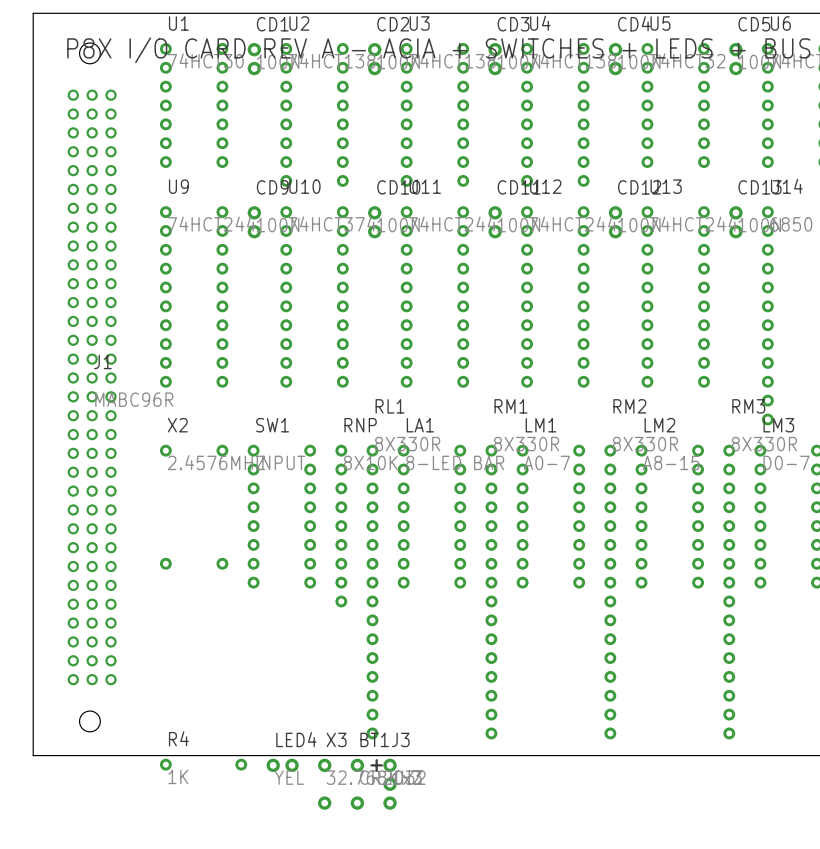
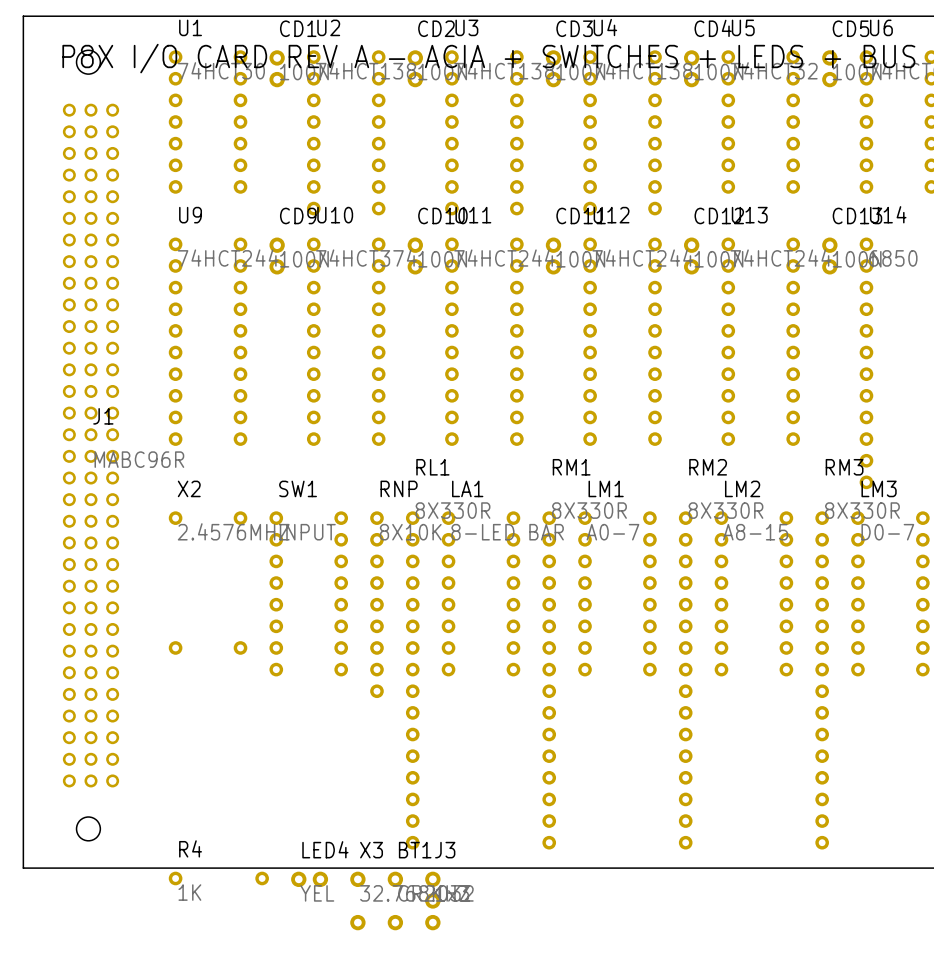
BT1 footprint: [350, 758, 384, 810] -> [387, 871, 404, 931]

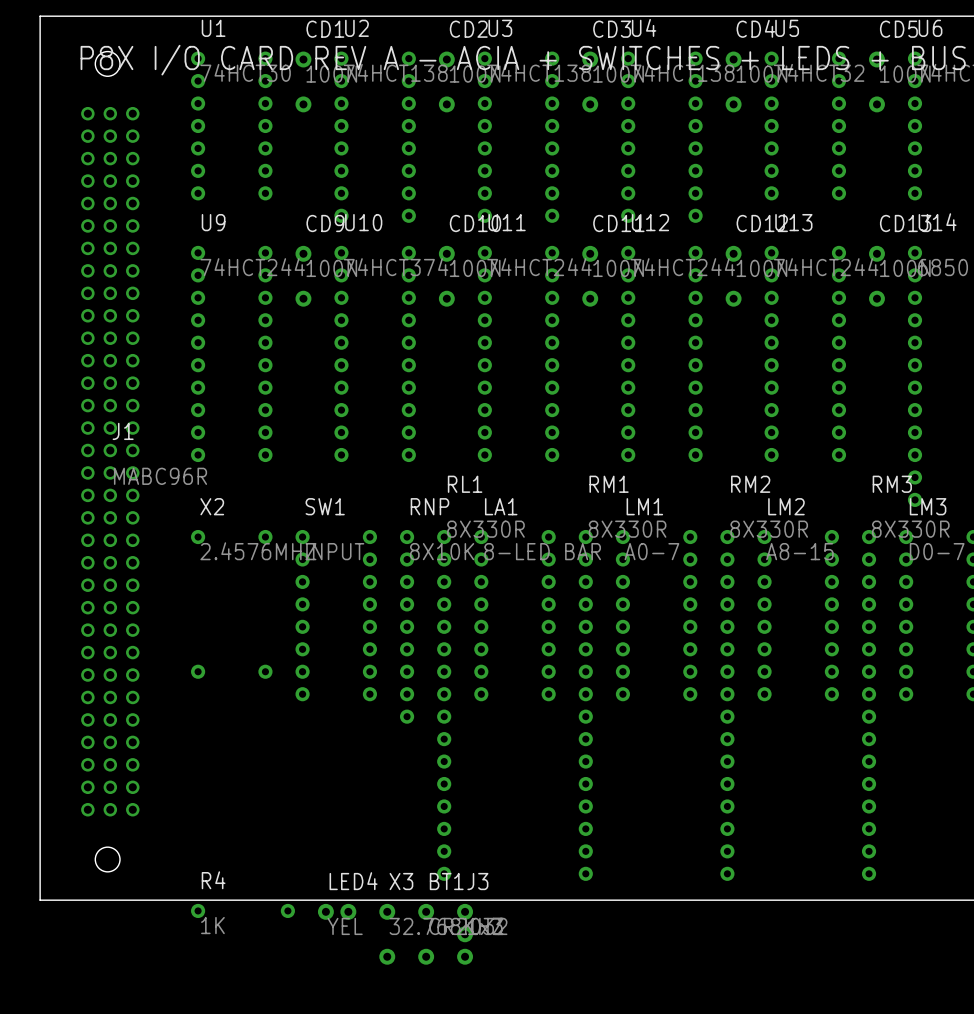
CD1 footprint: [269, 50, 285, 88] -> [295, 51, 312, 113]
CD2 footprint: [407, 50, 423, 88] -> [438, 51, 455, 113]
CD3 footprint: [545, 50, 562, 88] -> [582, 51, 599, 113]
CD4 footprint: [683, 50, 700, 88] -> [725, 51, 742, 113]
CD5 footprint: [822, 50, 838, 88] -> [869, 51, 885, 113]
CD9 footprint: [269, 237, 285, 275] -> [295, 245, 312, 307]
CD10 footprint: [407, 237, 423, 275] -> [438, 245, 455, 307]
CD11 footprint: [545, 237, 562, 275] -> [582, 245, 599, 307]
CD12 footprint: [683, 237, 700, 275] -> [725, 245, 742, 307]
CD13 footprint: [822, 237, 838, 275] -> [869, 245, 885, 307]

